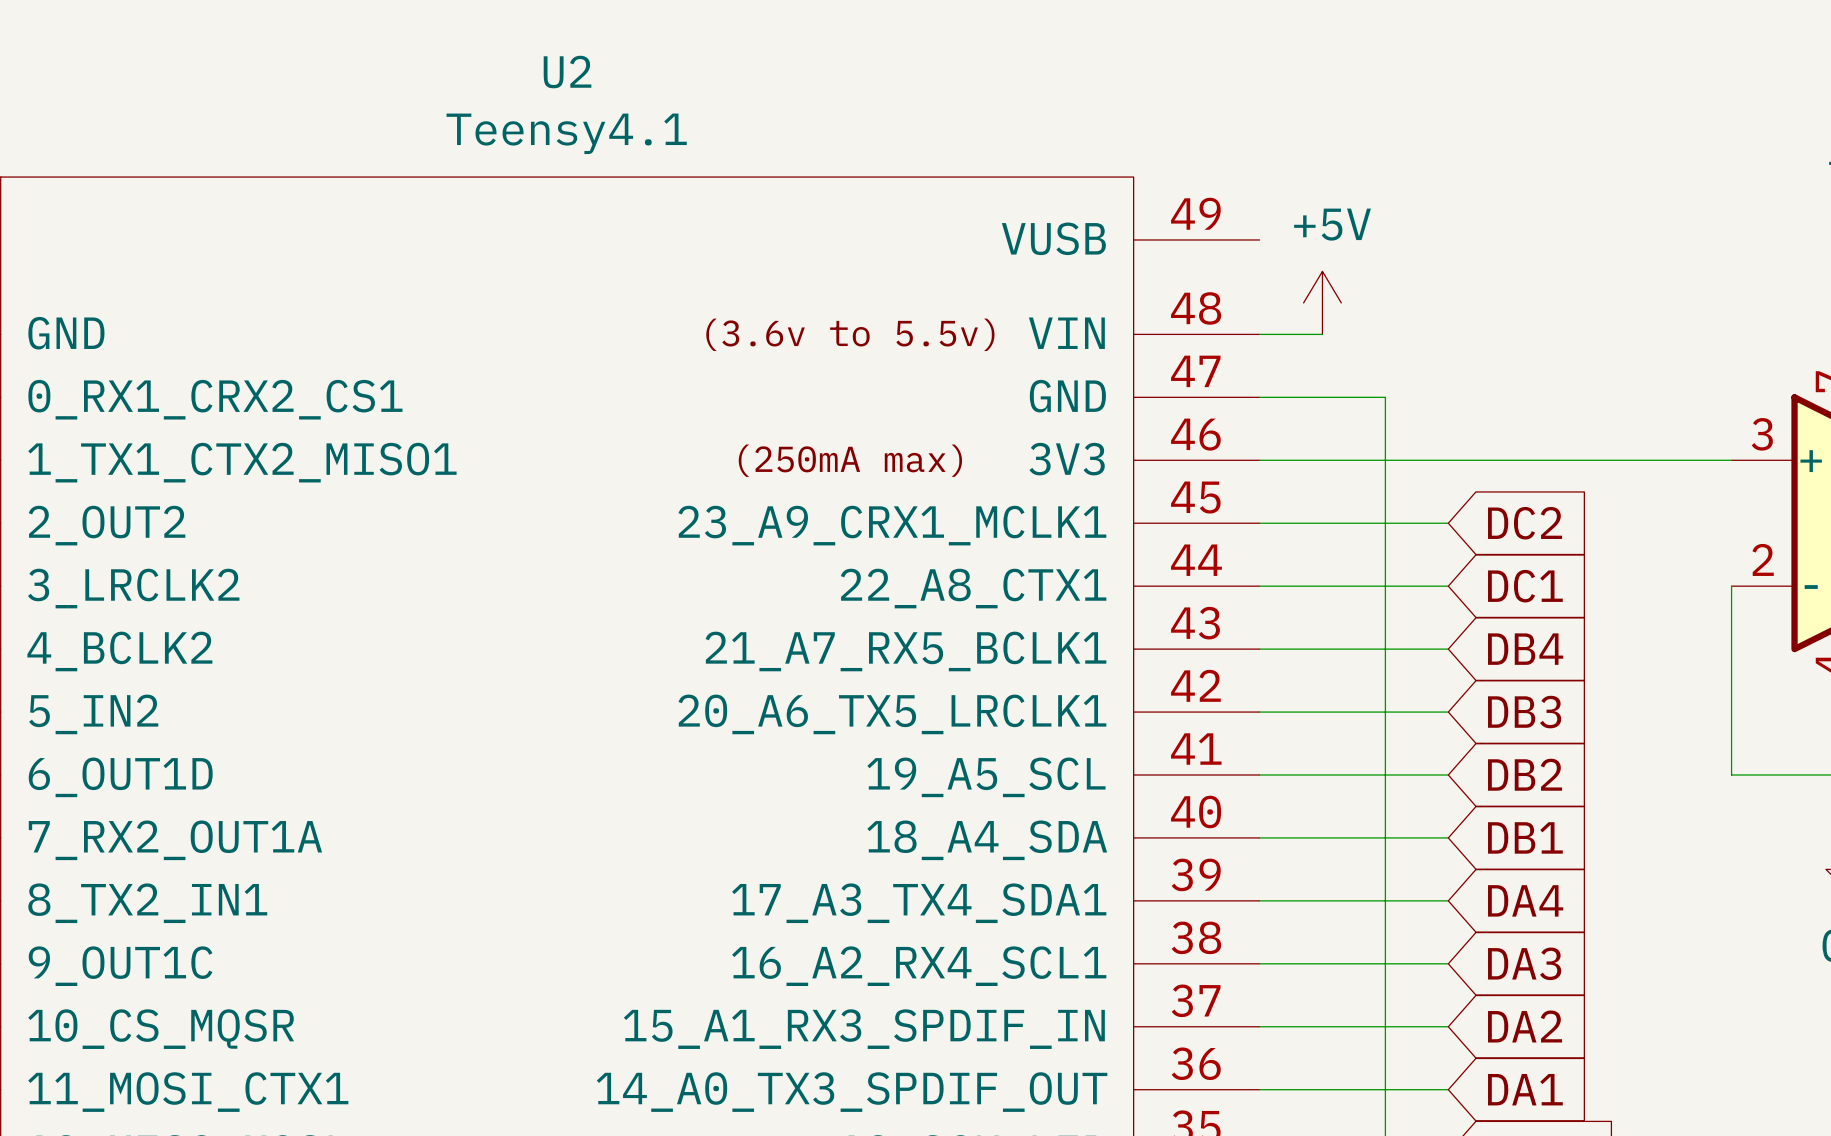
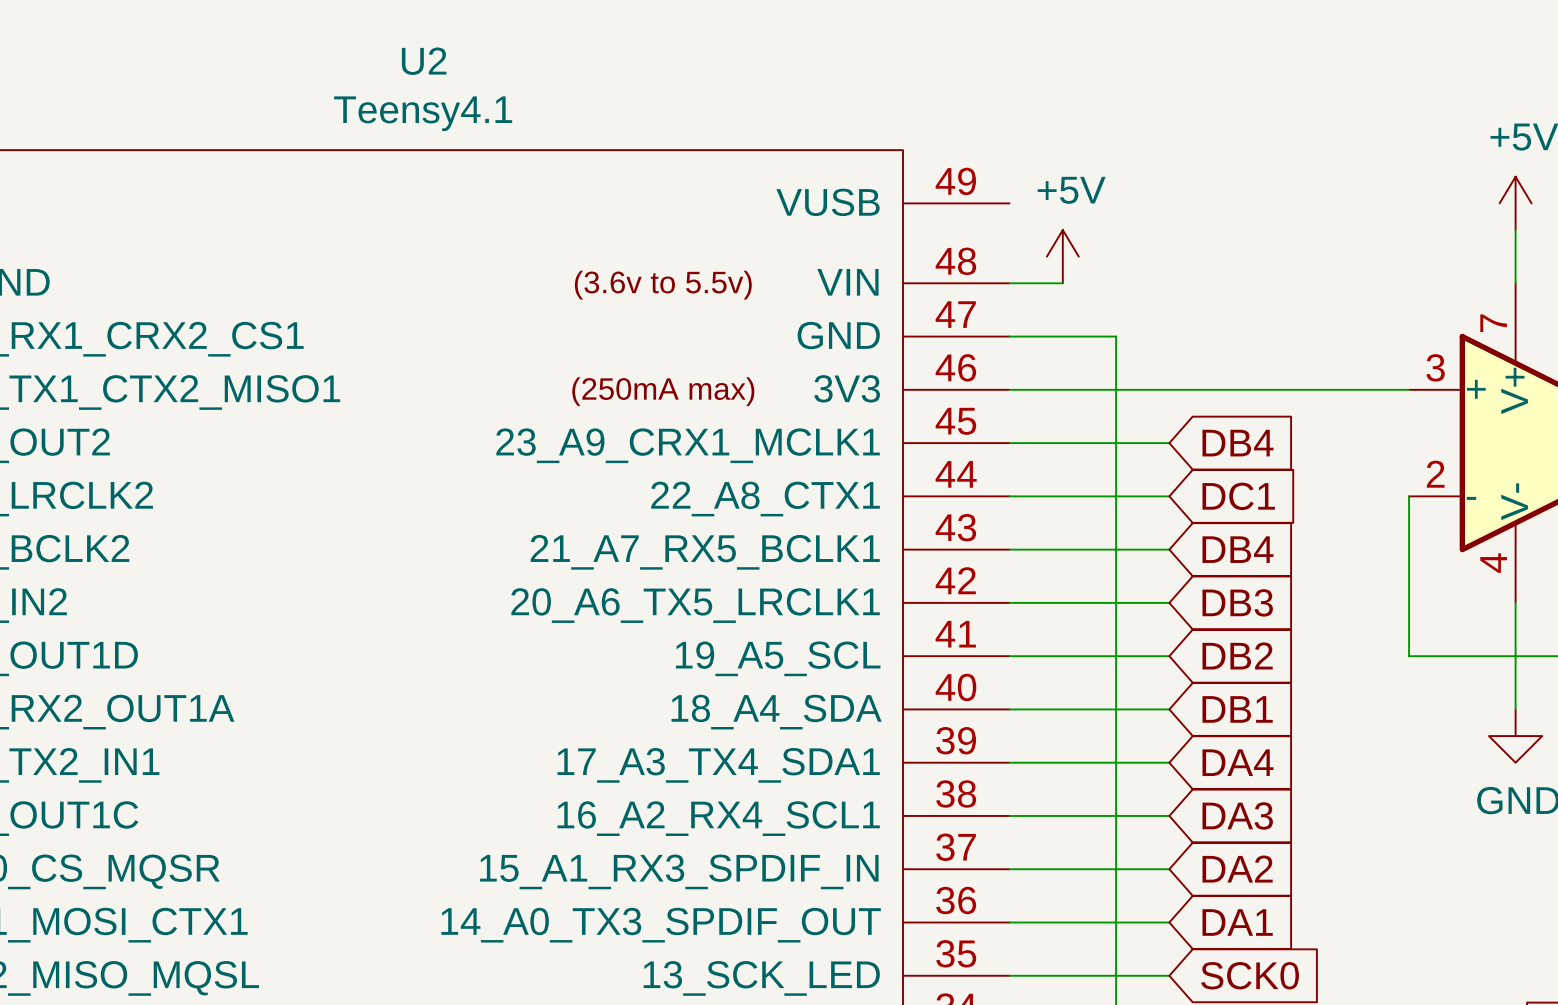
global label: DC2 (1525, 523) -> DB4 (1237, 443)

